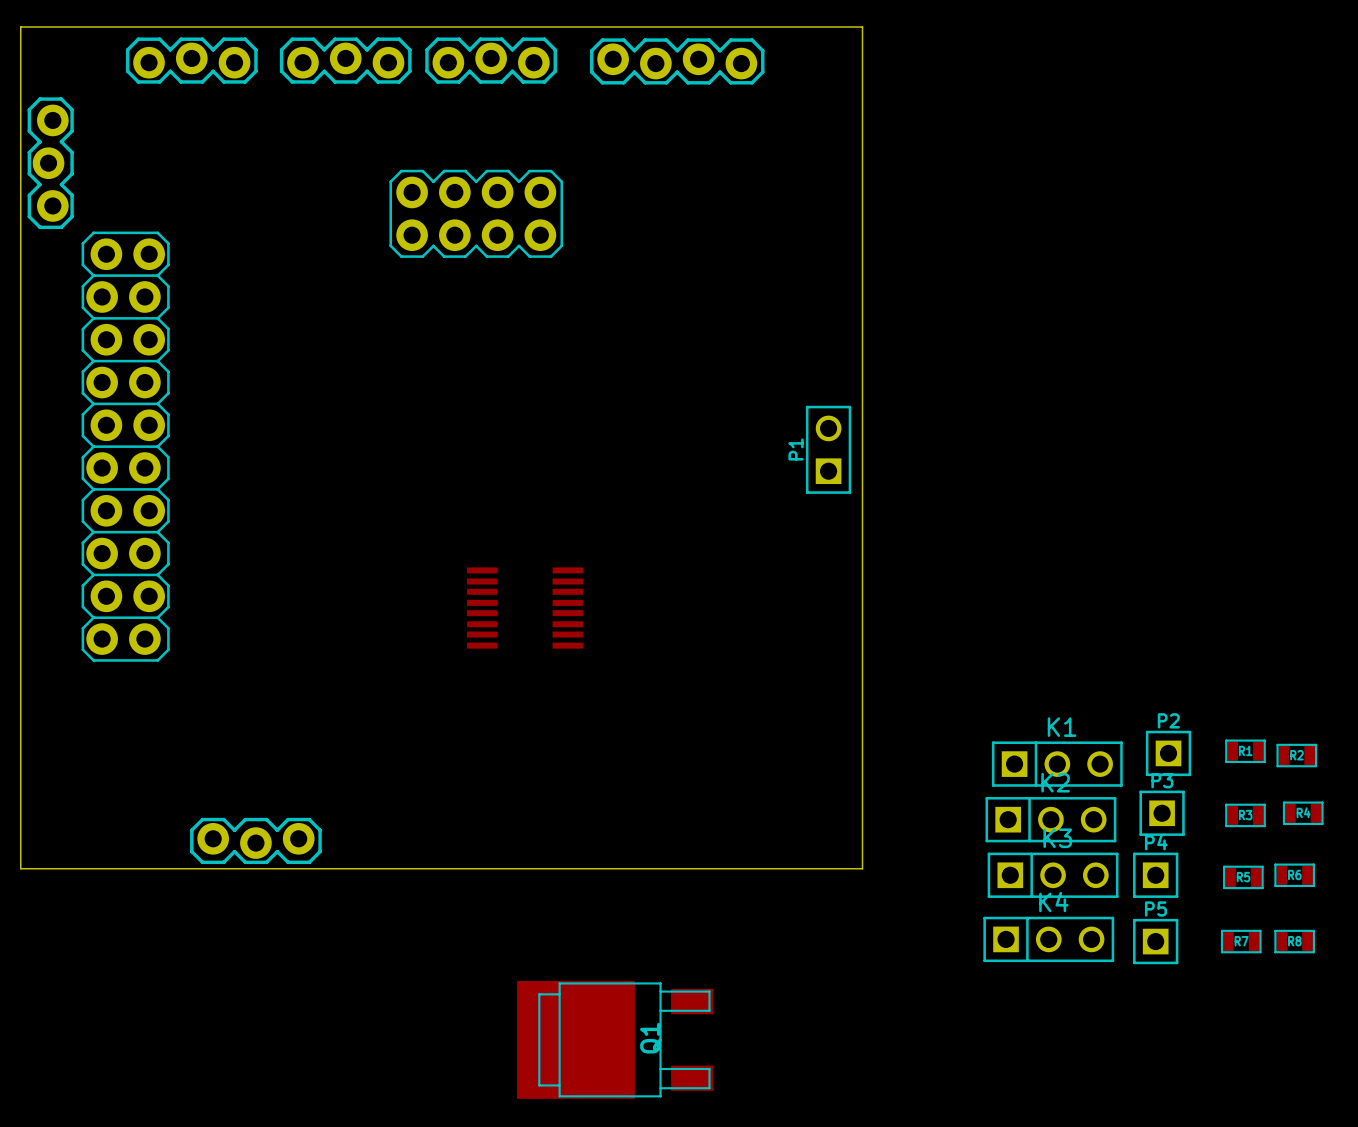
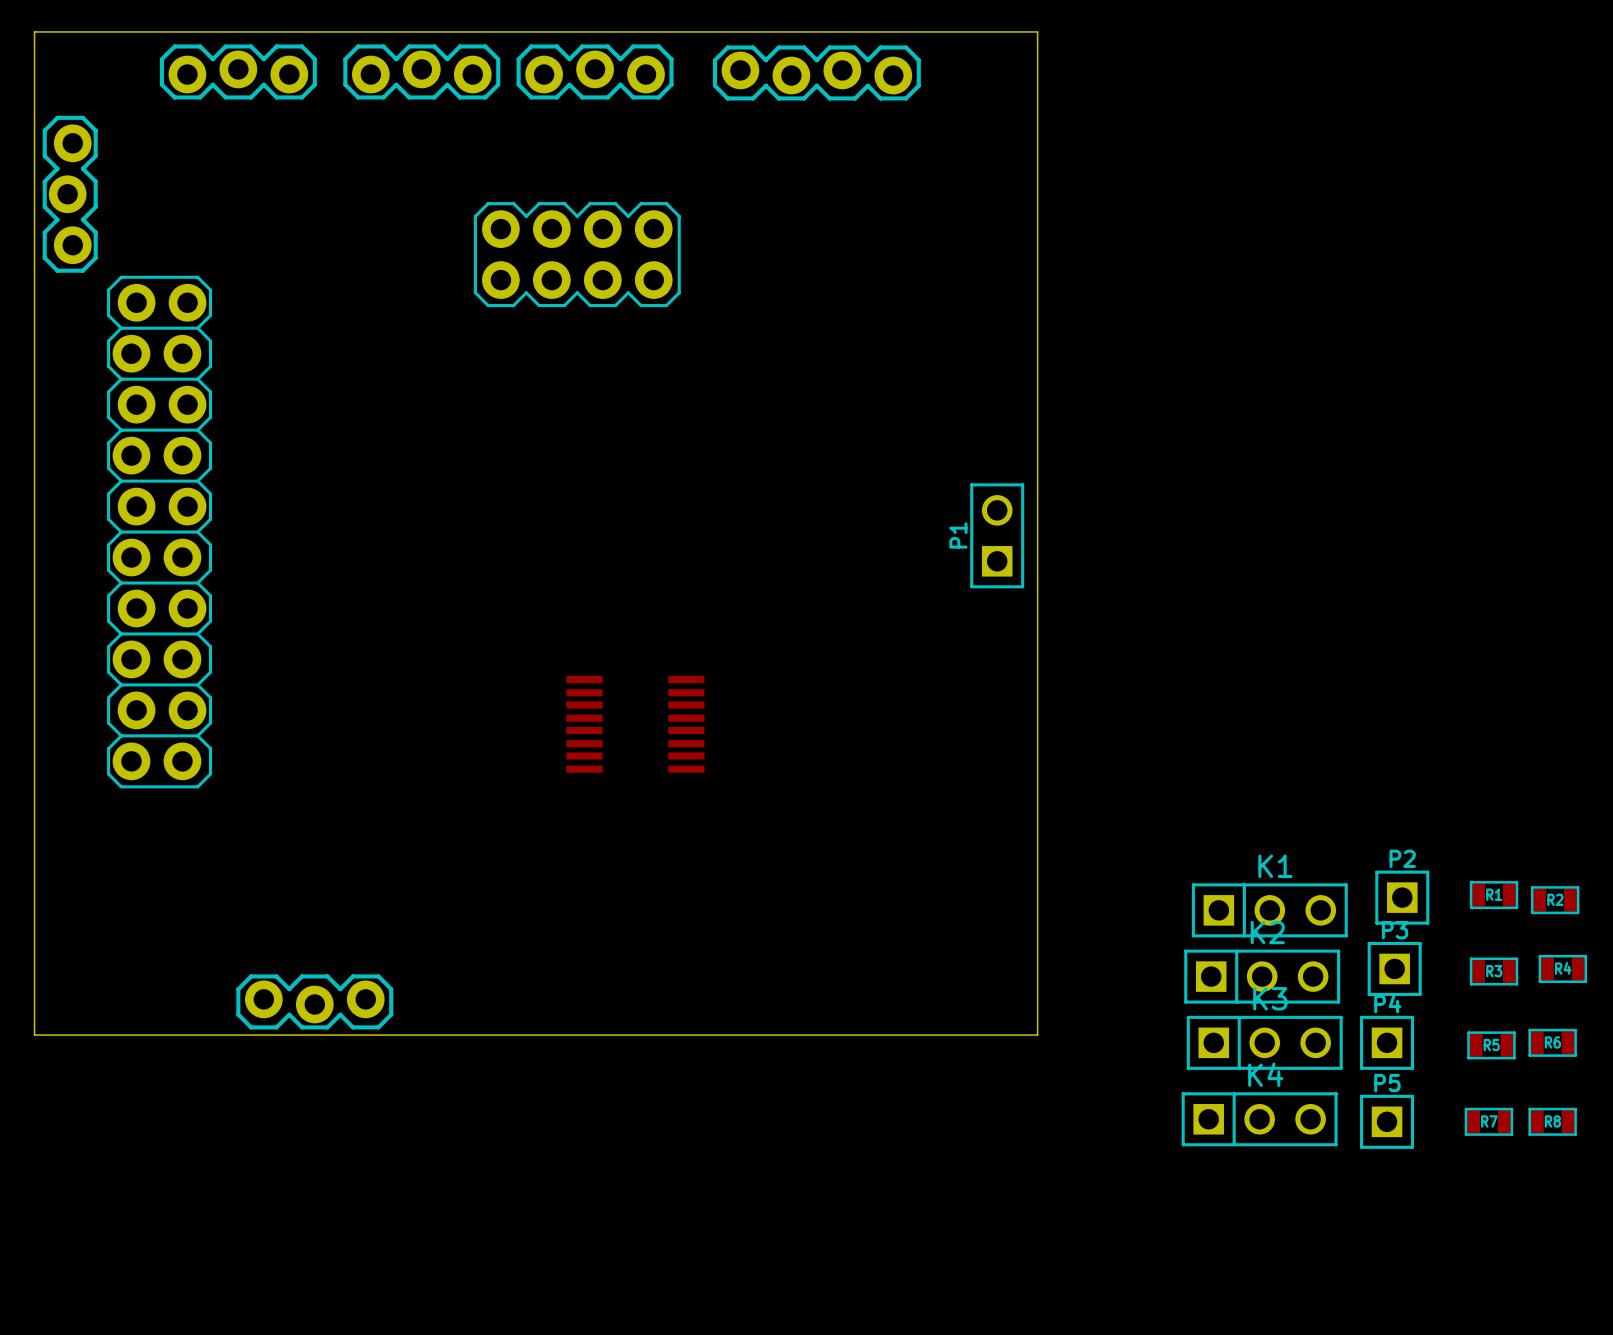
Q1: (615, 1039) -> none

